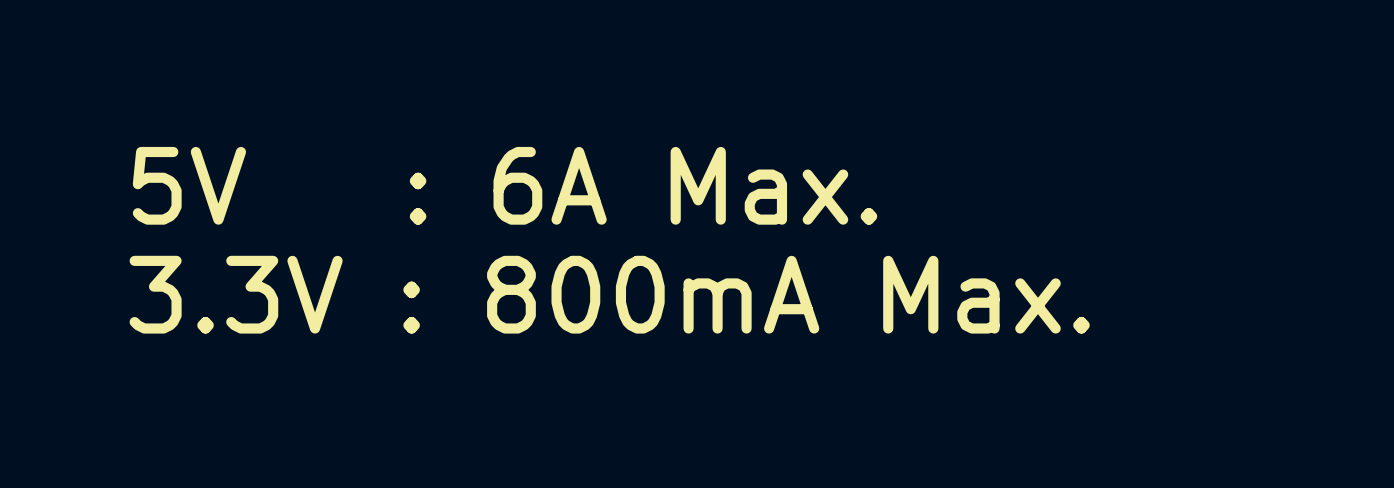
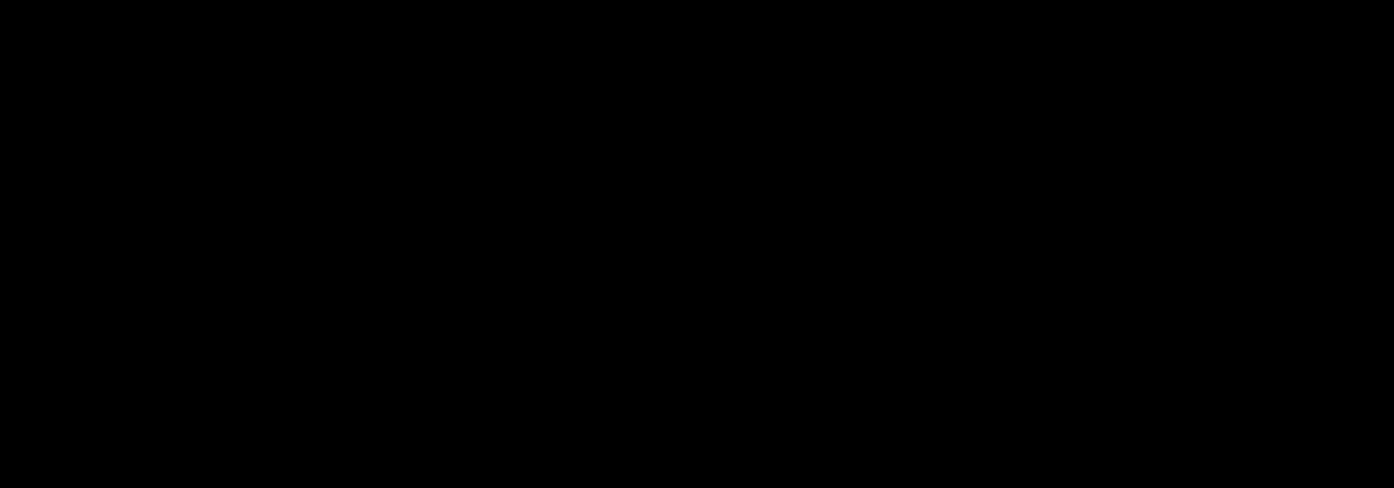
text: 5V : 6A Max. (505, 185) -> none
text: 3.3V : 800mA Max. (609, 294) -> none

